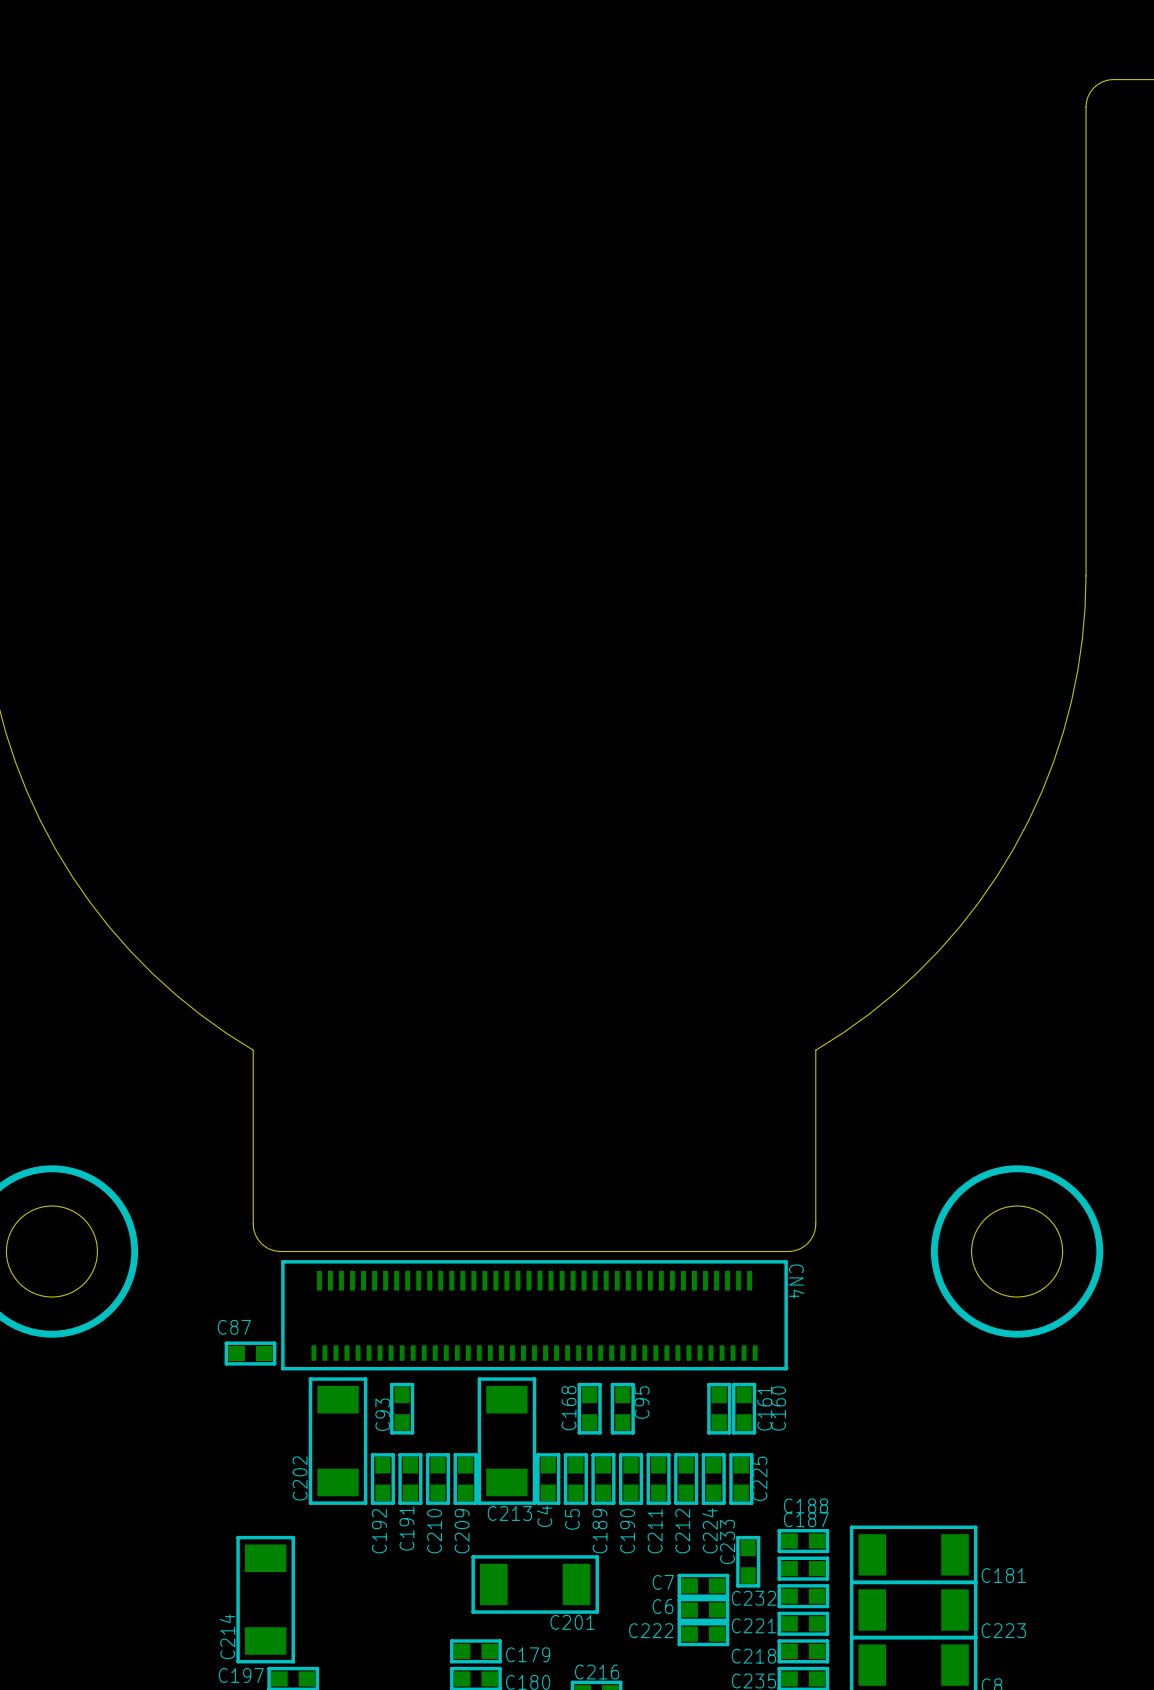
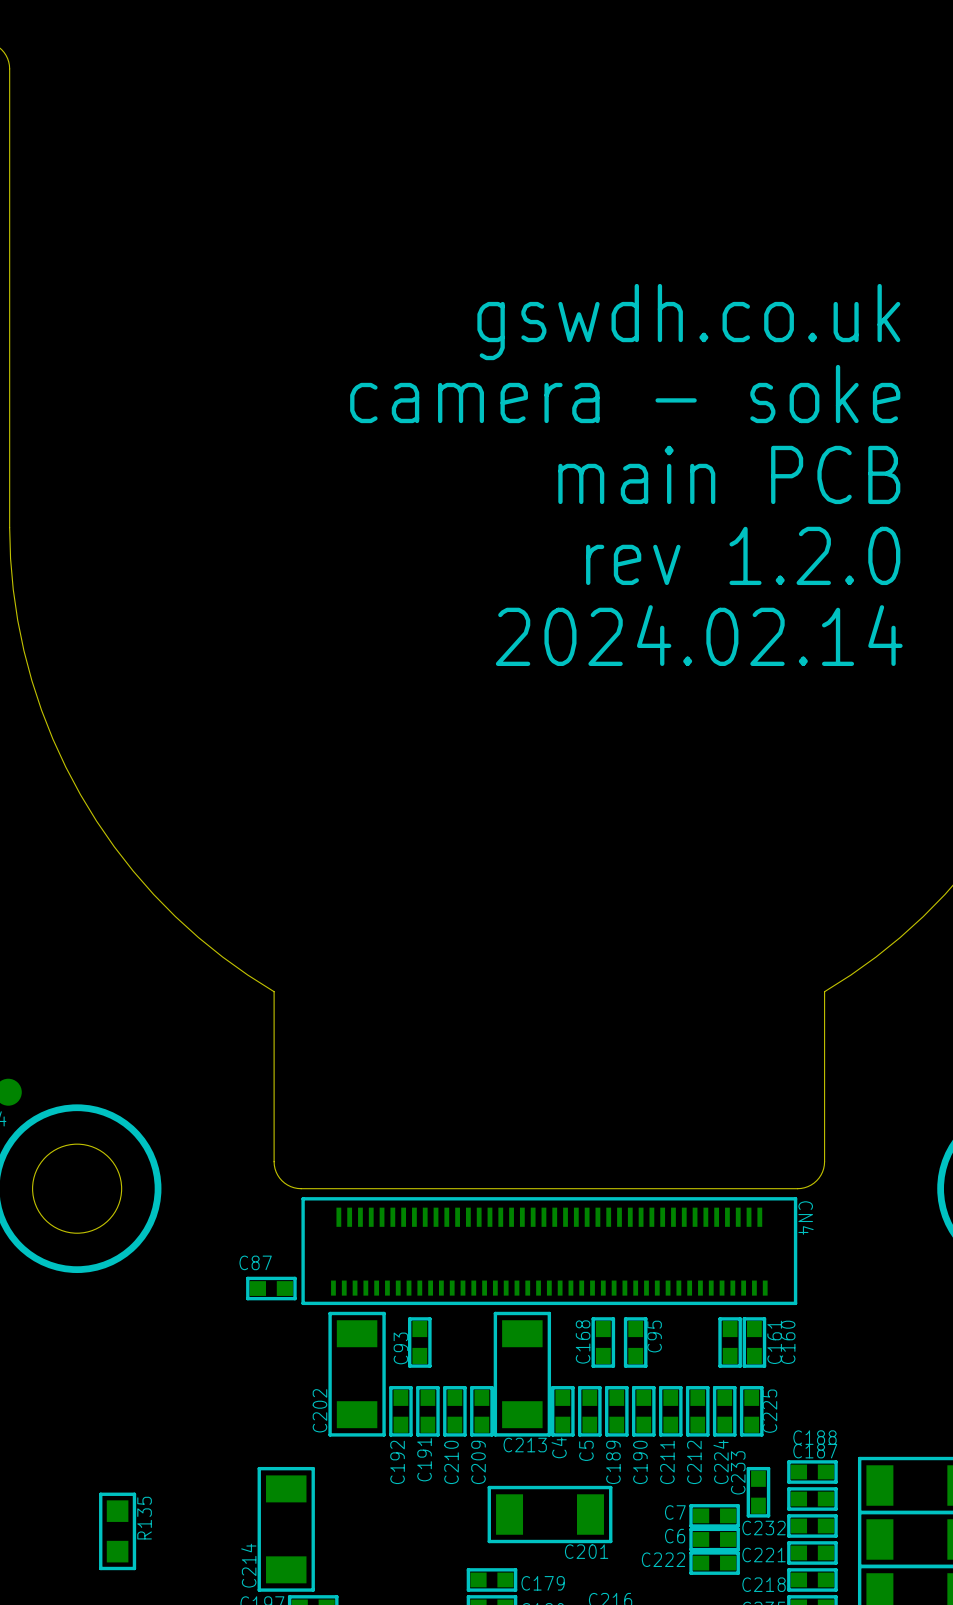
text: none -> gswdh.co.uk (688, 322)
text: none -> camera - soke (625, 393)
text: none -> main PCB (729, 474)
text: none -> rev 1.2.0 (743, 555)
text: none -> 2024.02.14 (699, 635)
R135: none -> (117, 1531)

